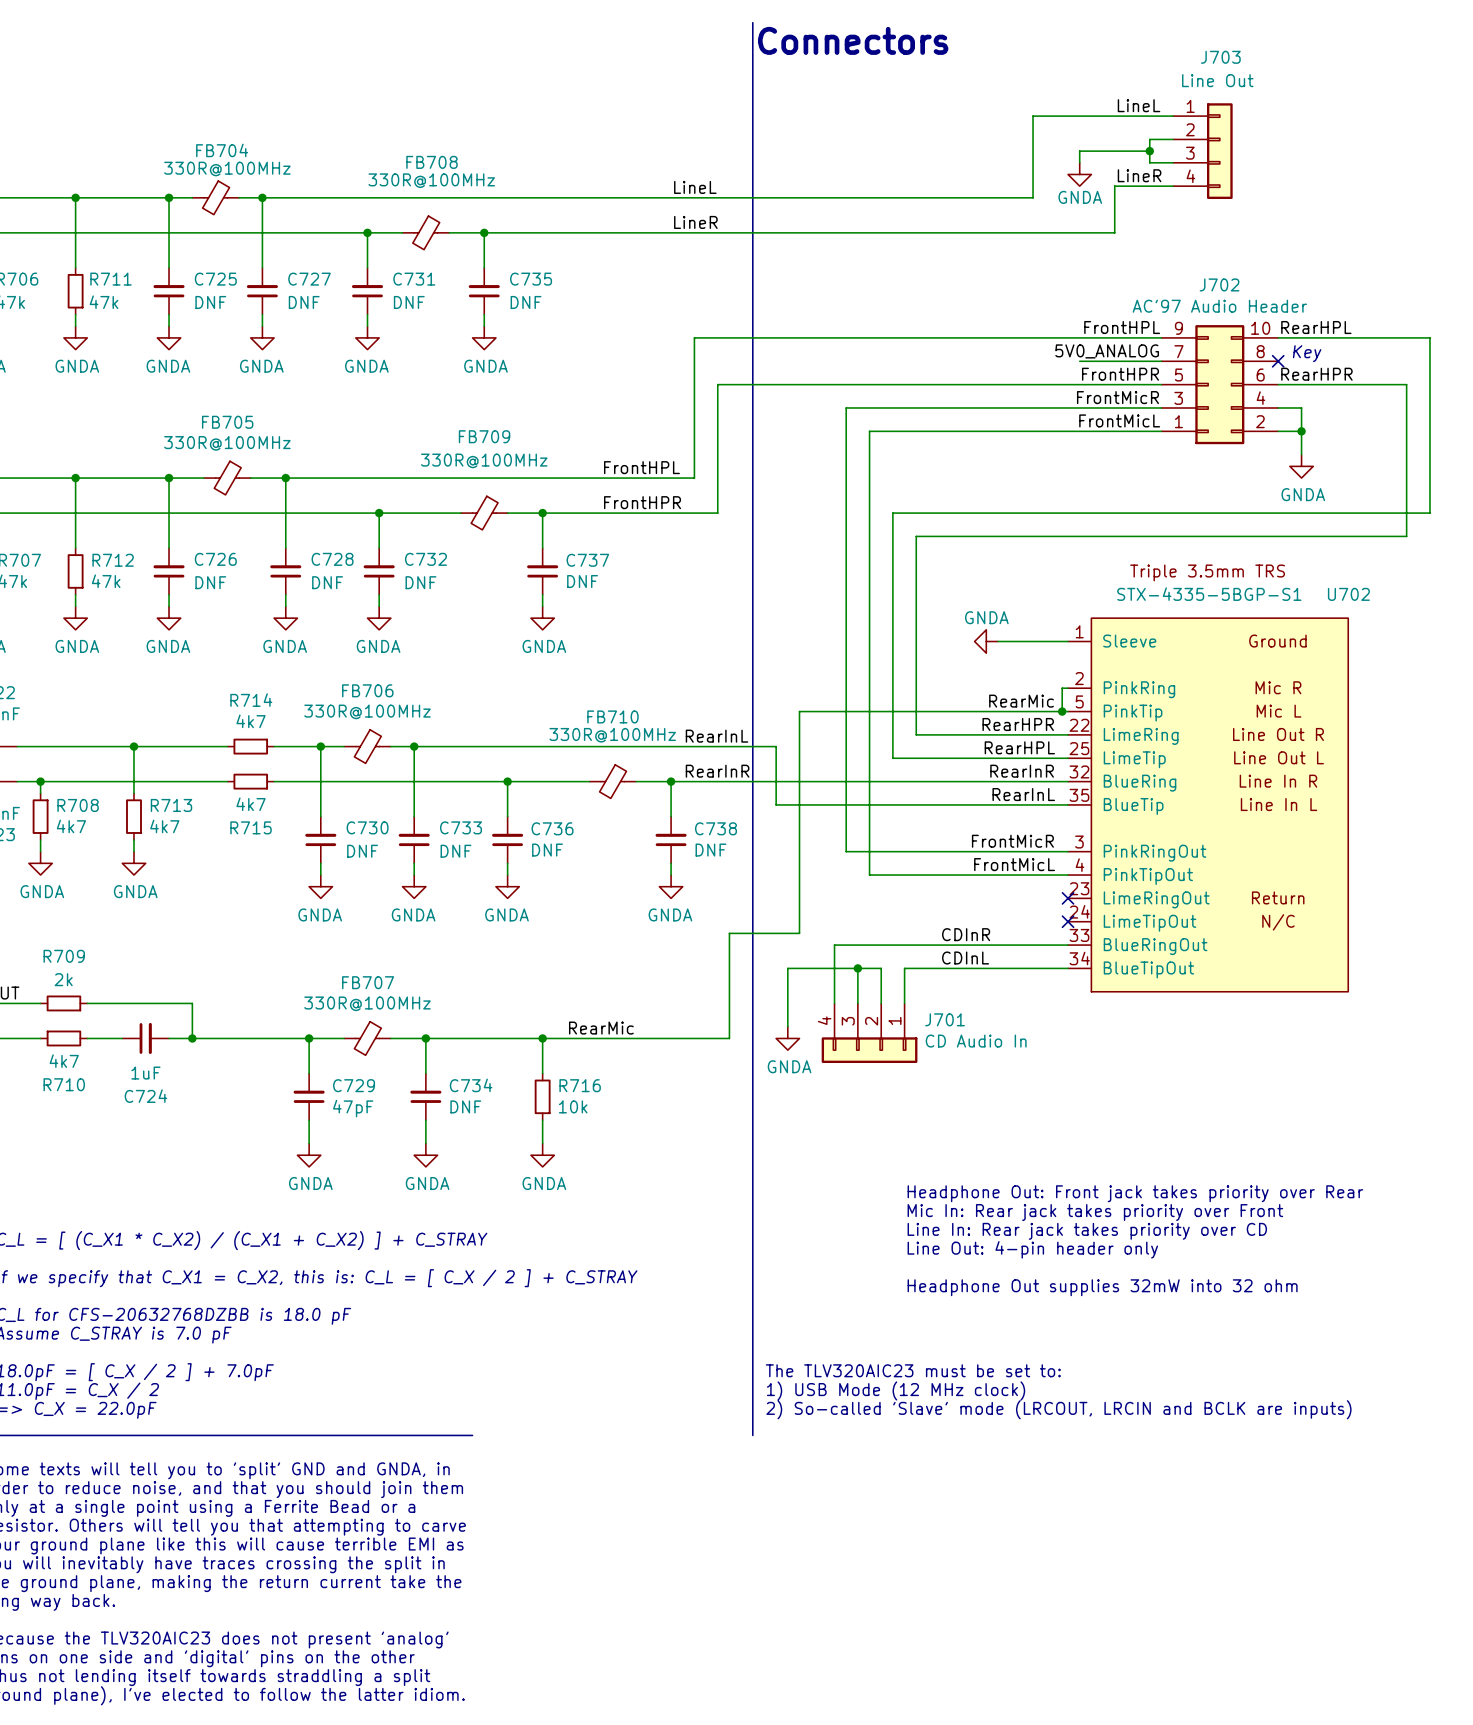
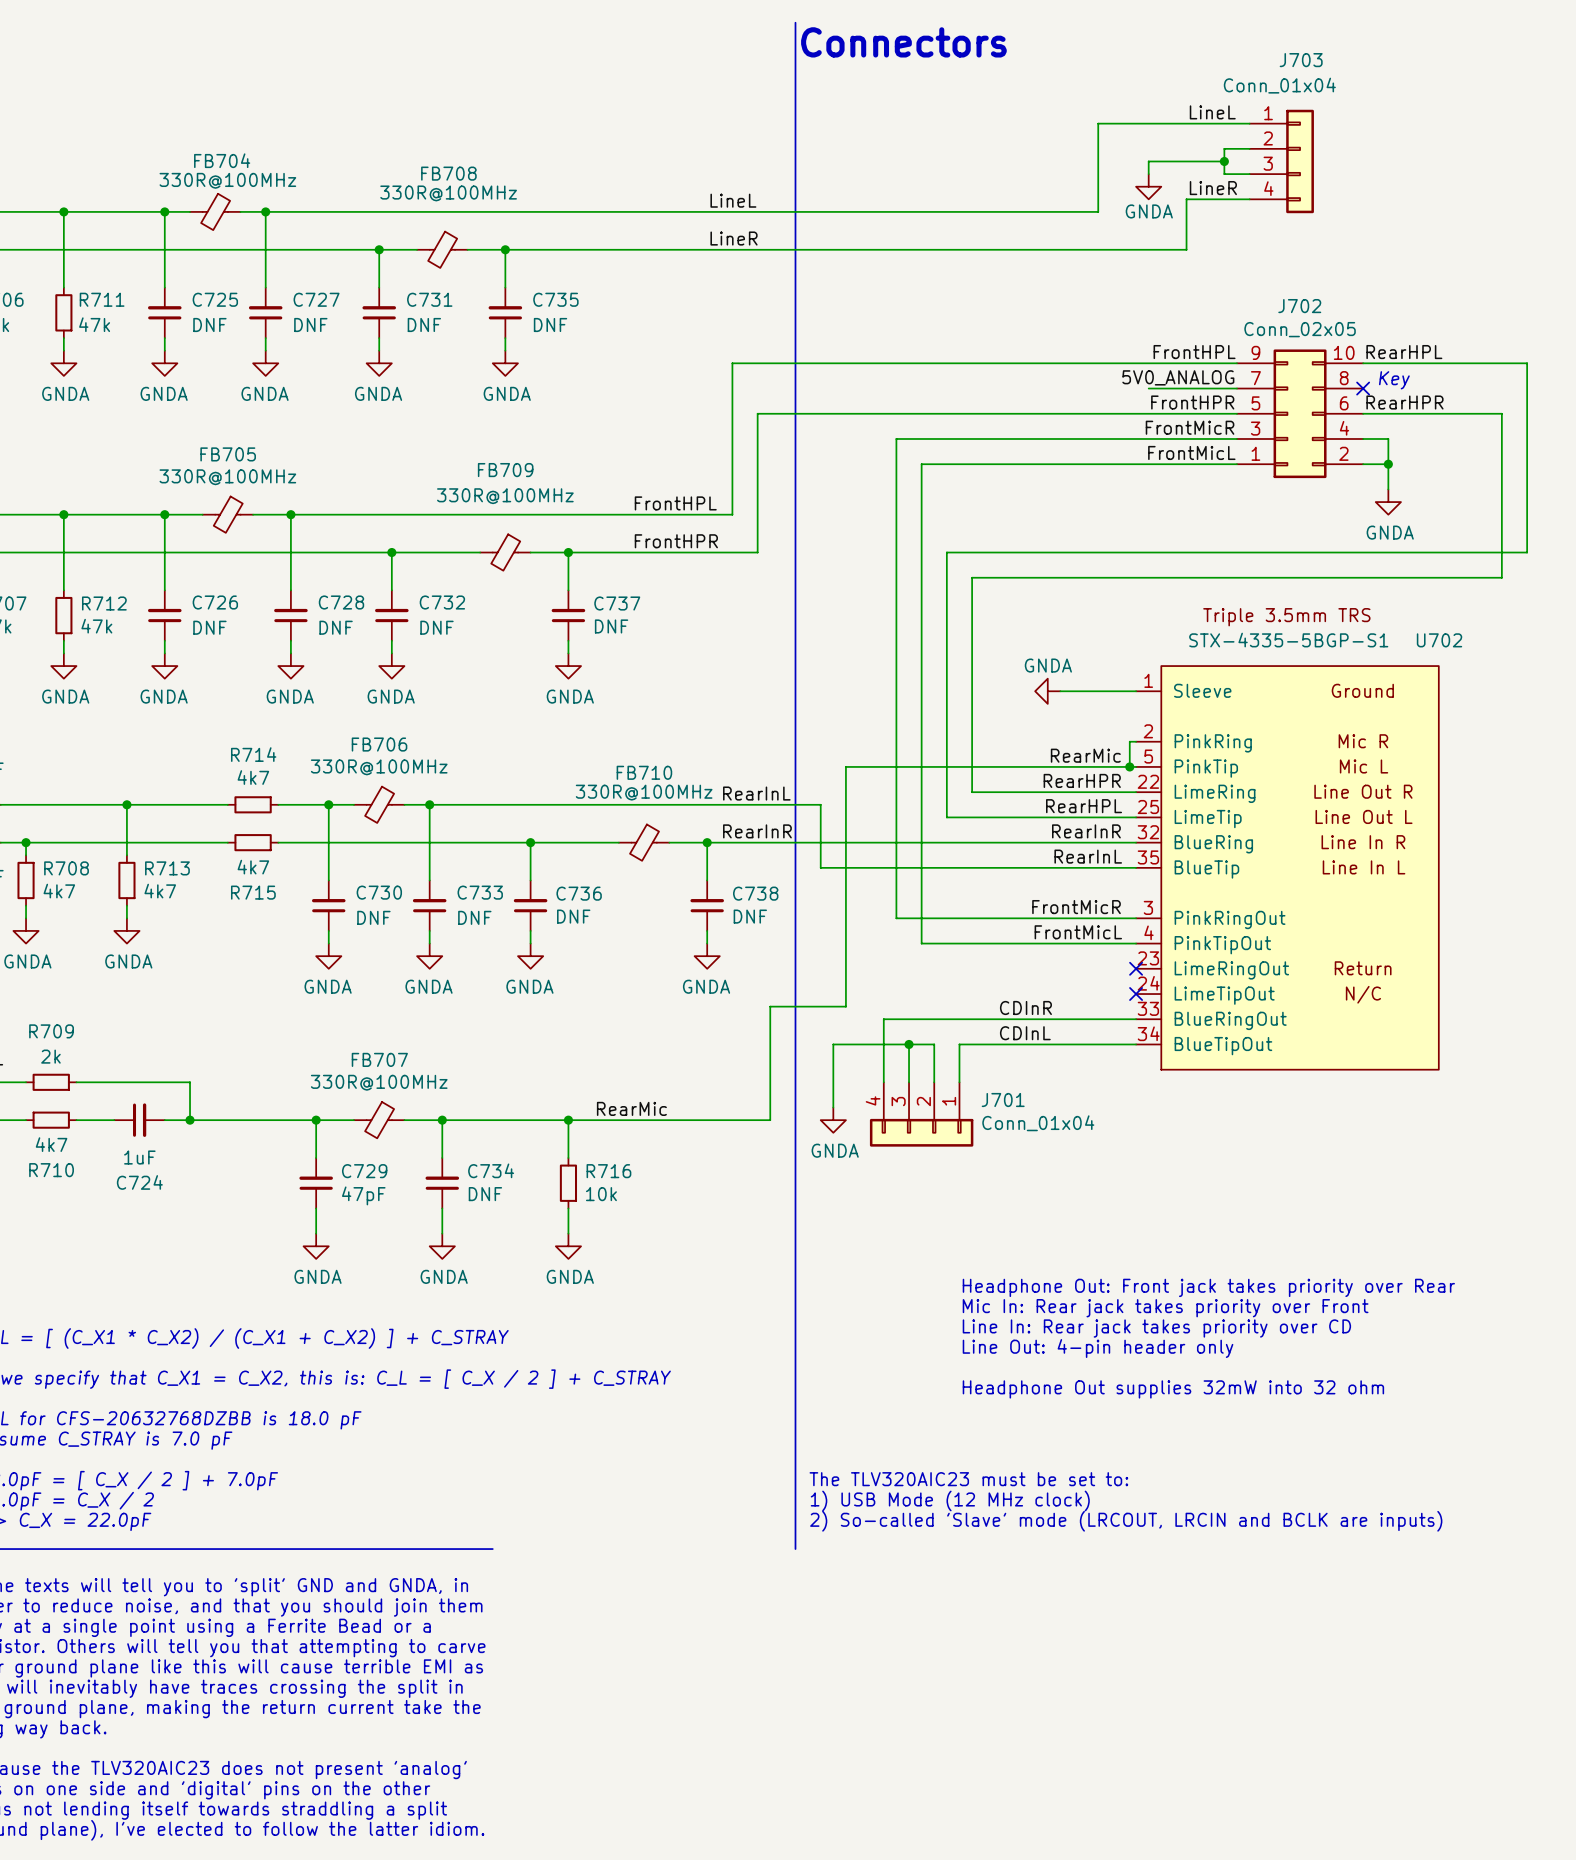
J703 value: Line Out (1217, 80) -> Conn_01x04 (1279, 85)
J702 value: AC'97 Audio Header (1219, 306) -> Conn_02x05 (1300, 329)
J701 value: CD Audio In (976, 1041) -> Conn_01x04 (1038, 1123)

